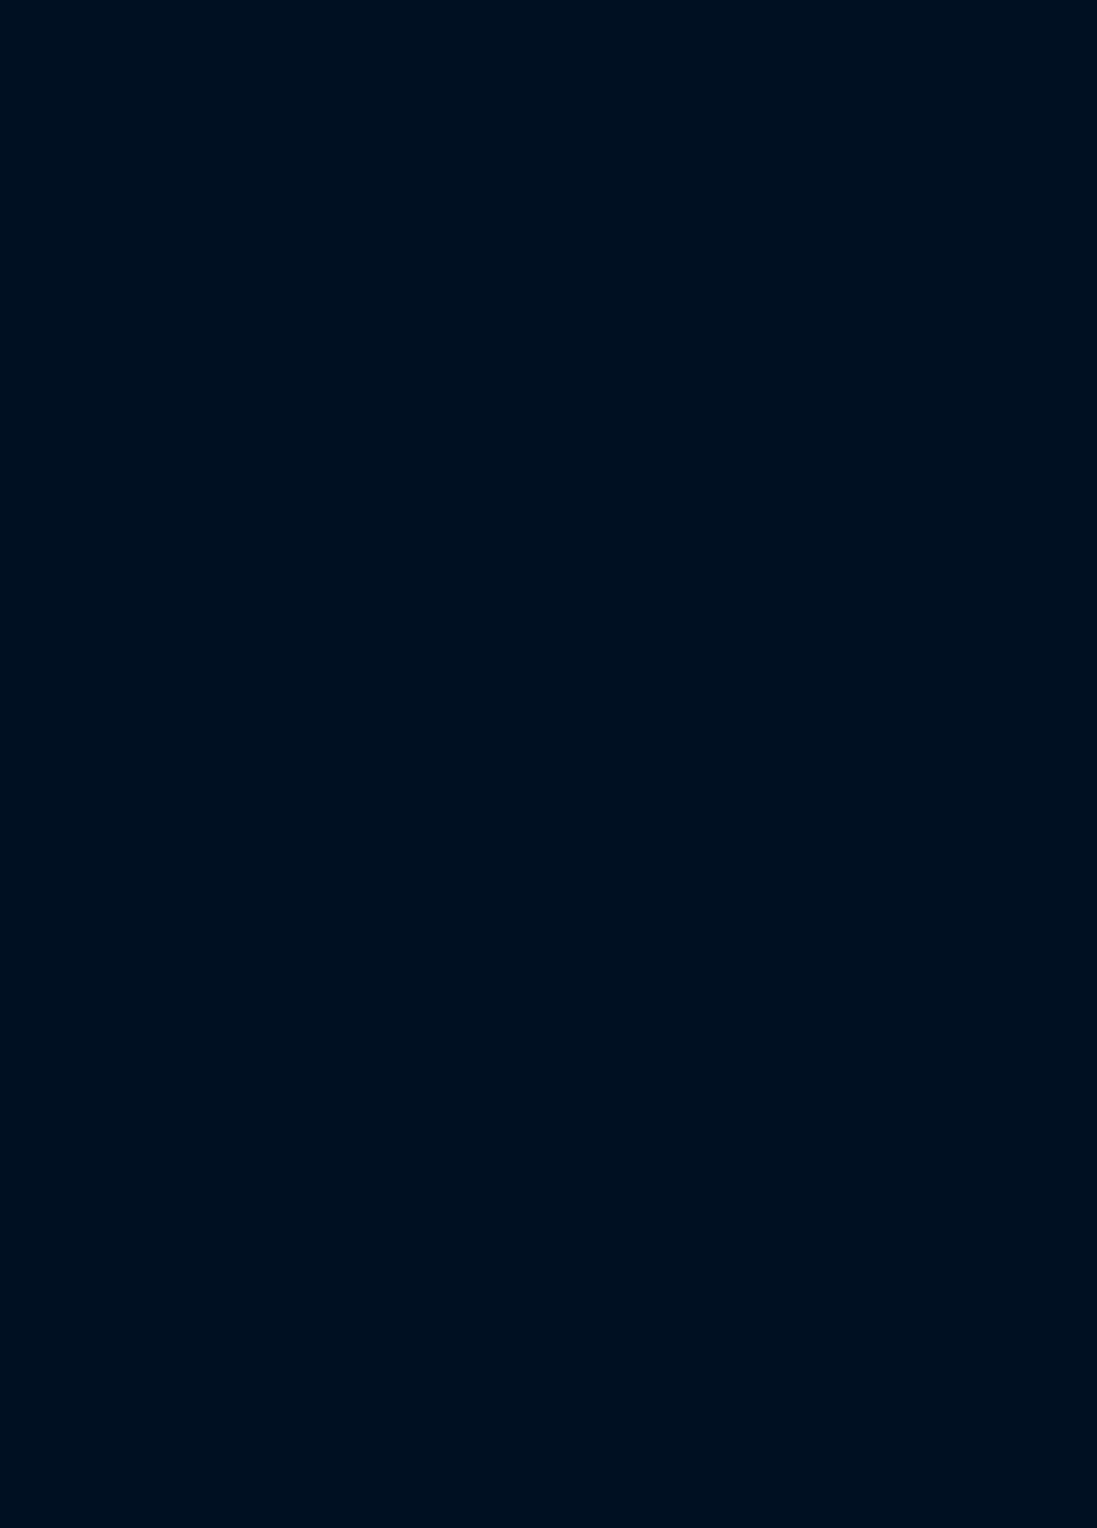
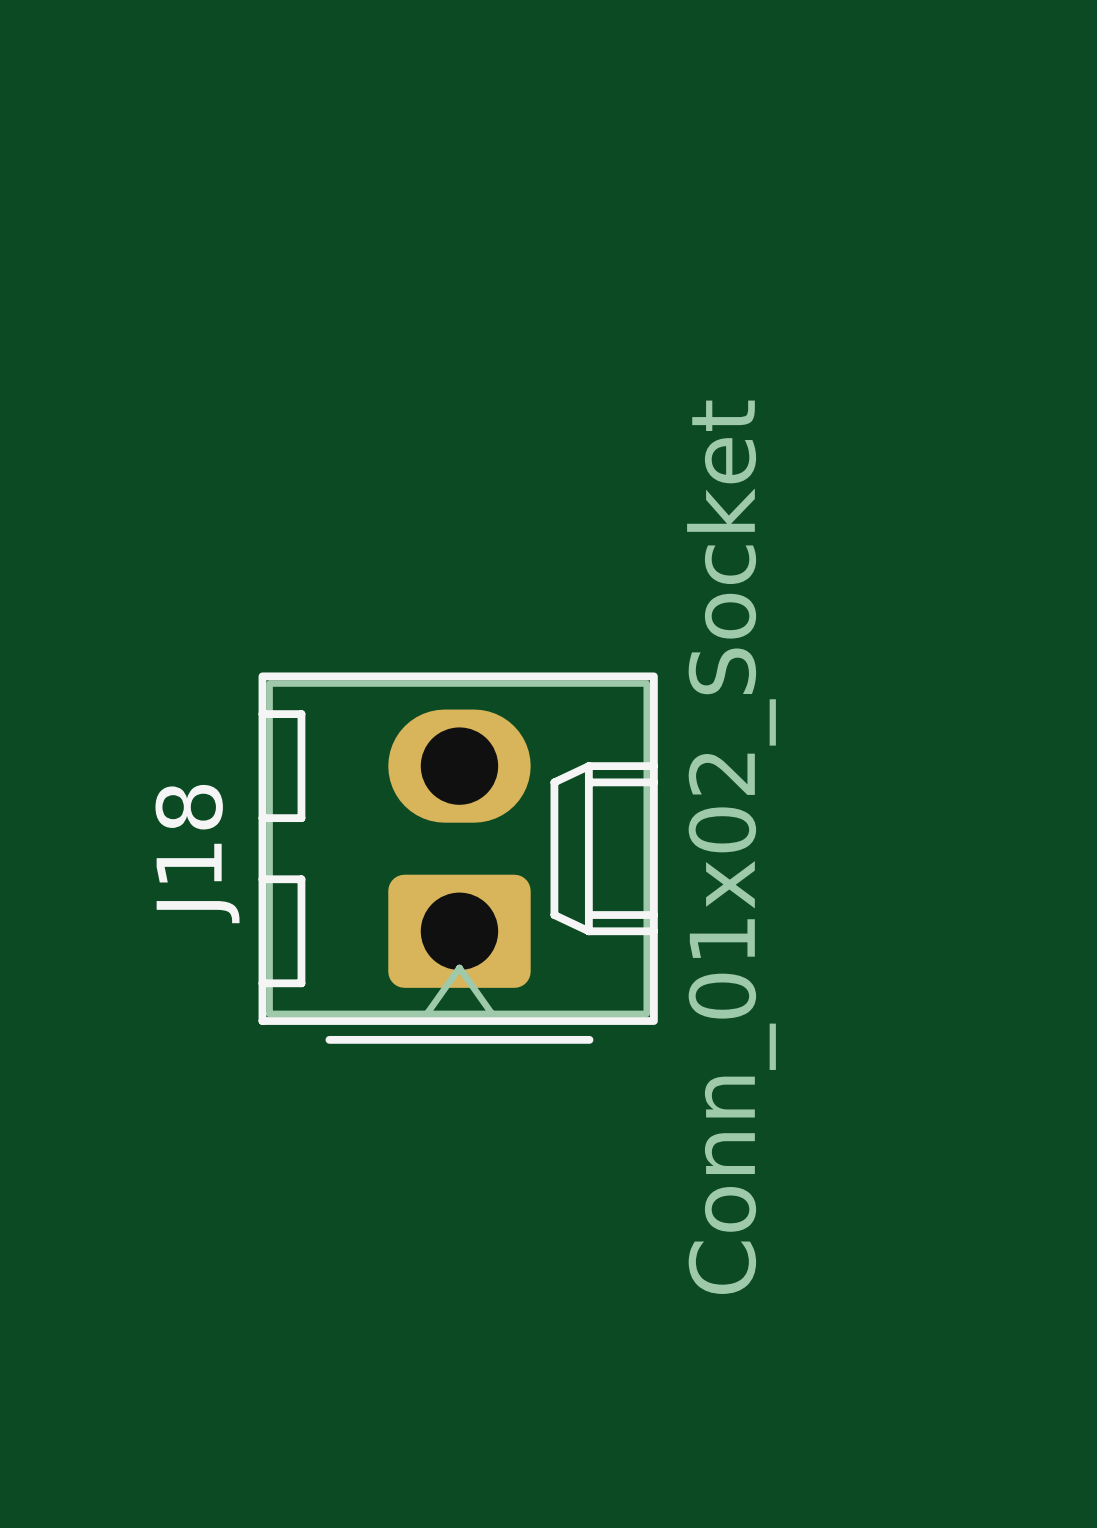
J18: none -> Conn_01x02_Socket (458, 858)

